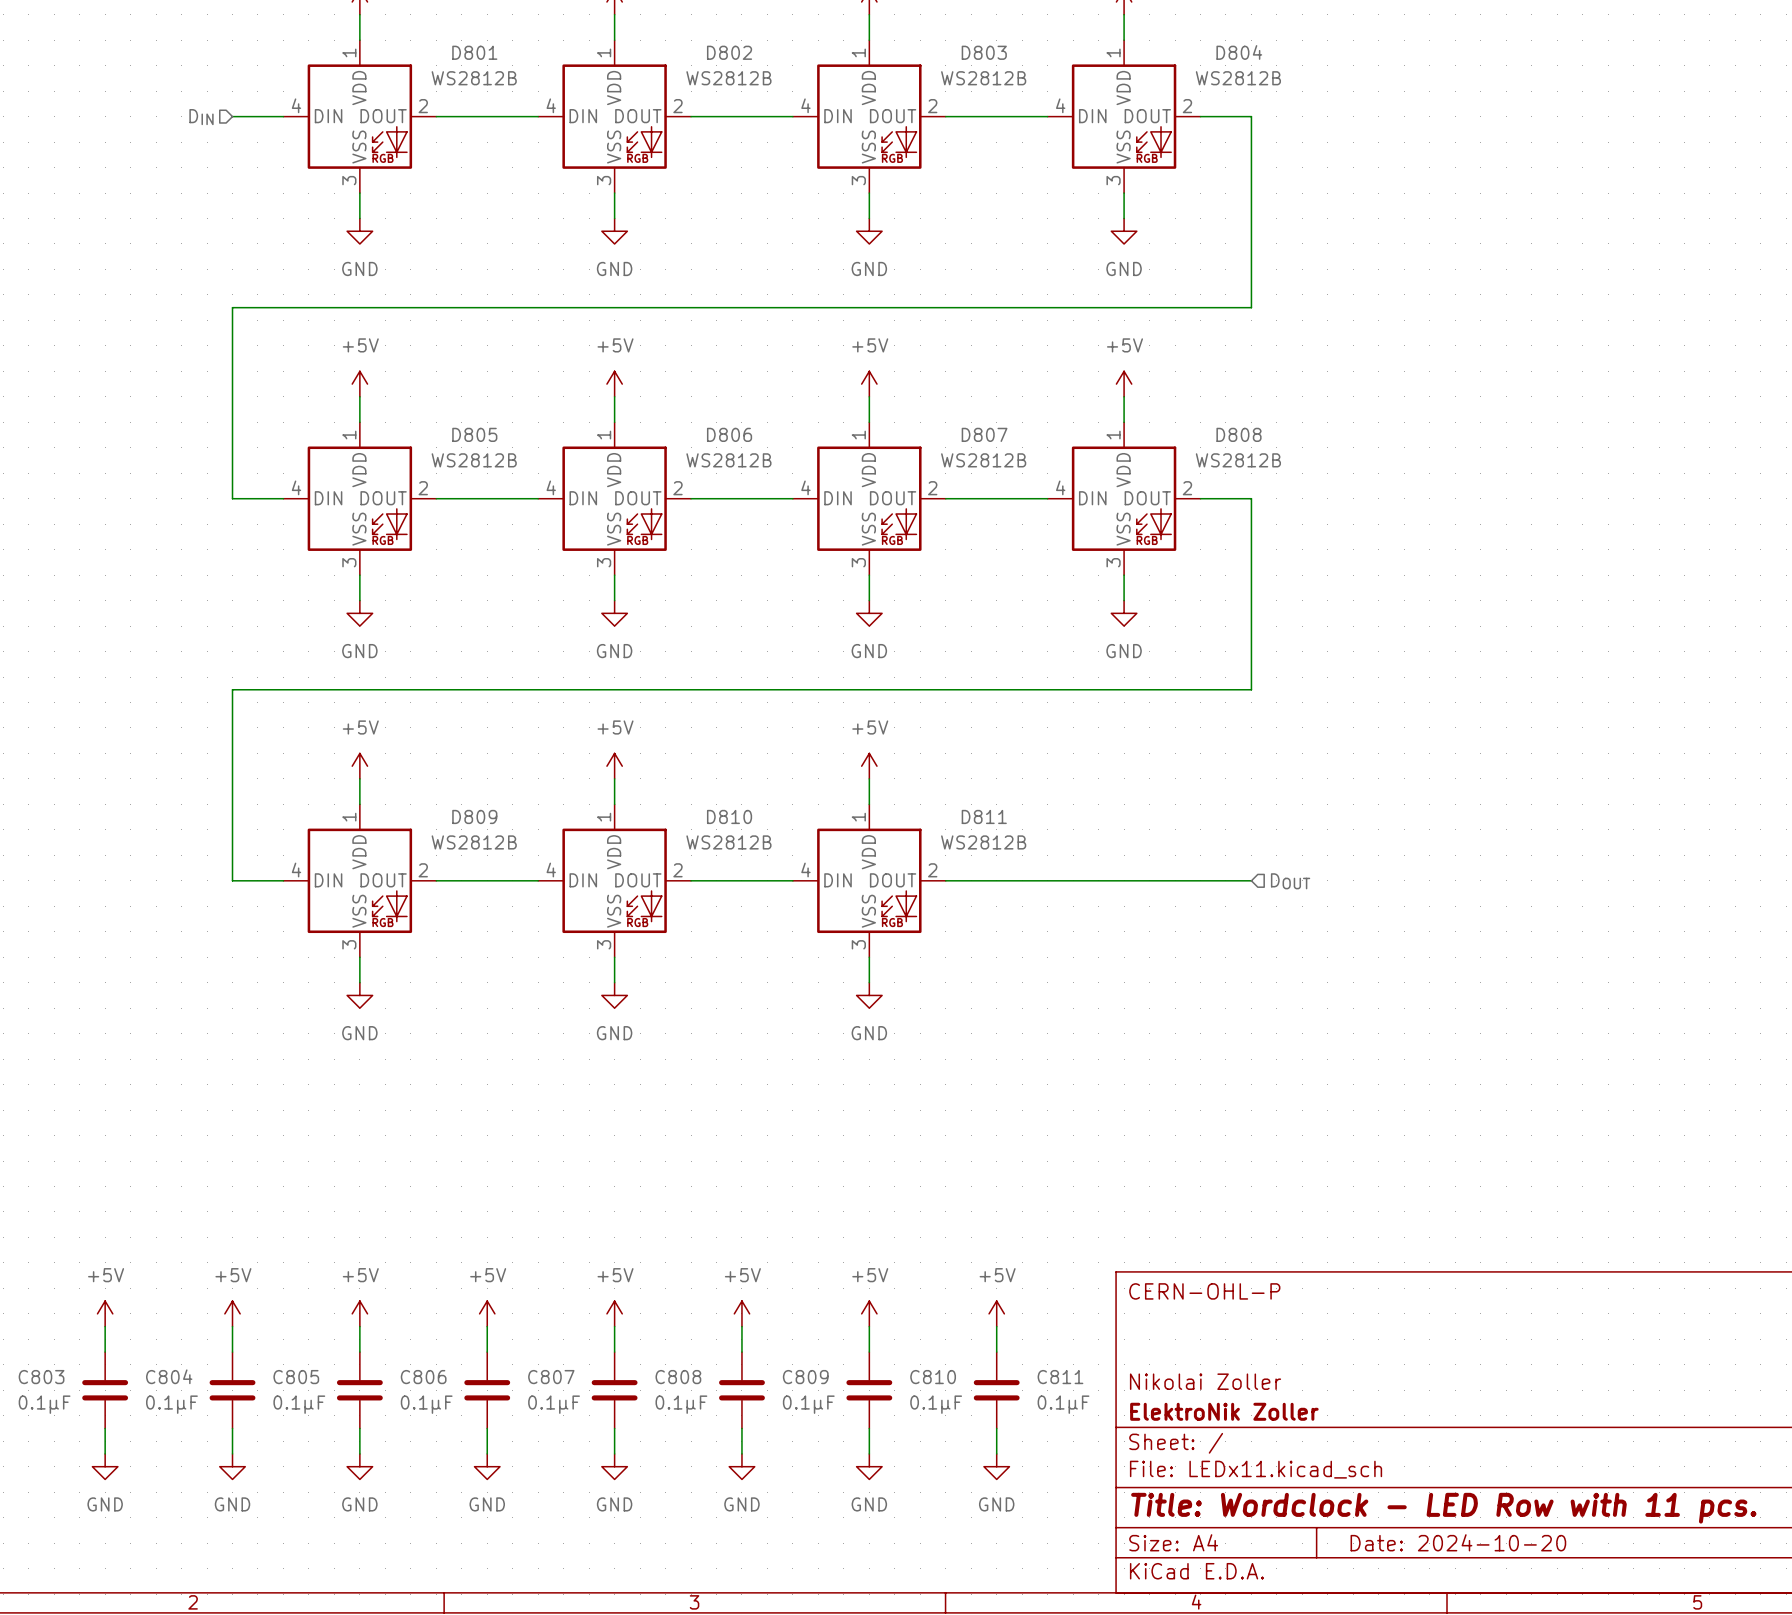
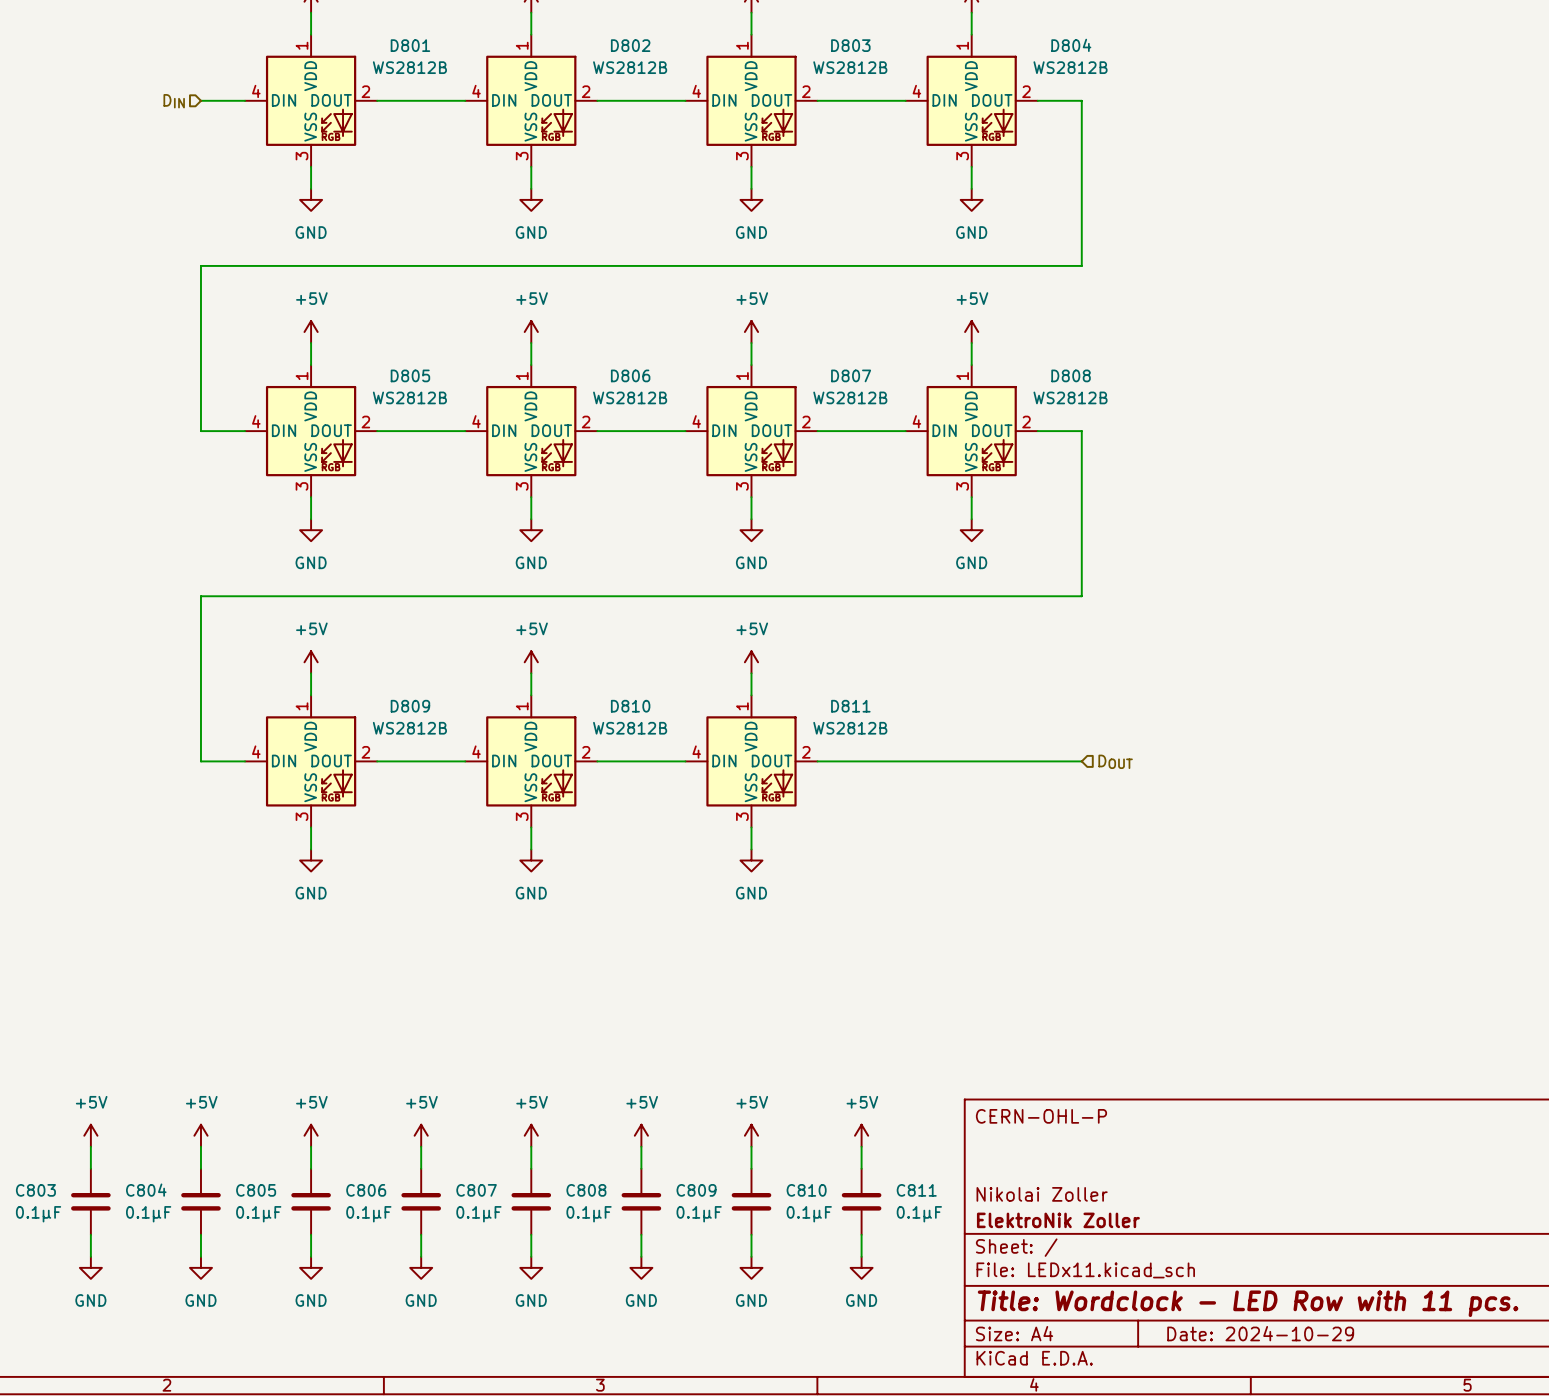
title block: Date: 2024-10-20 (1458, 1542) -> Date: 2024-10-29 (1260, 1333)

